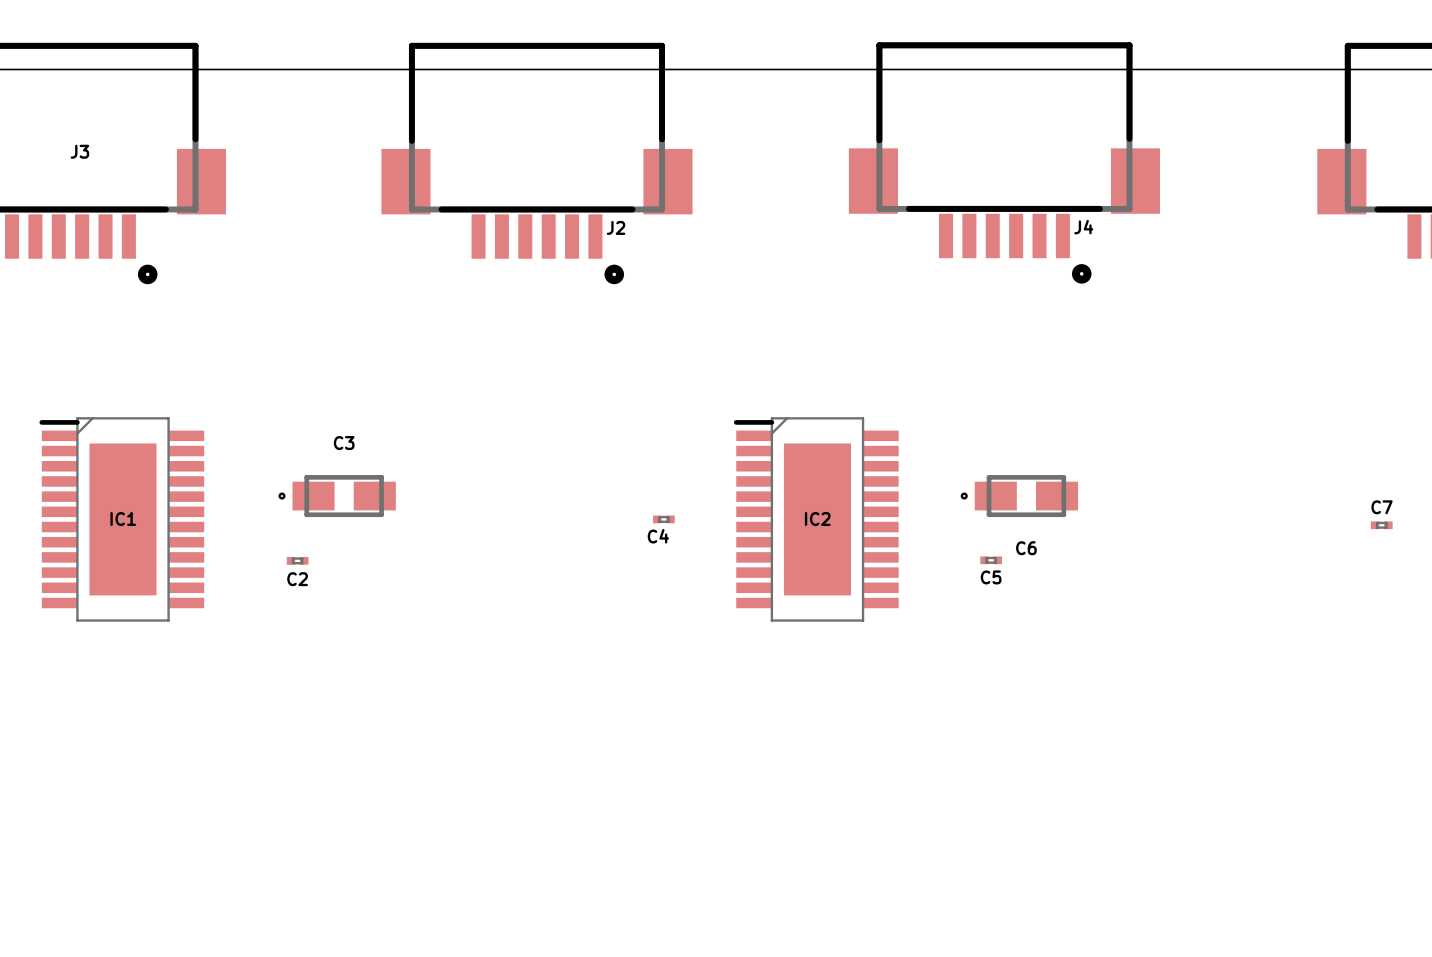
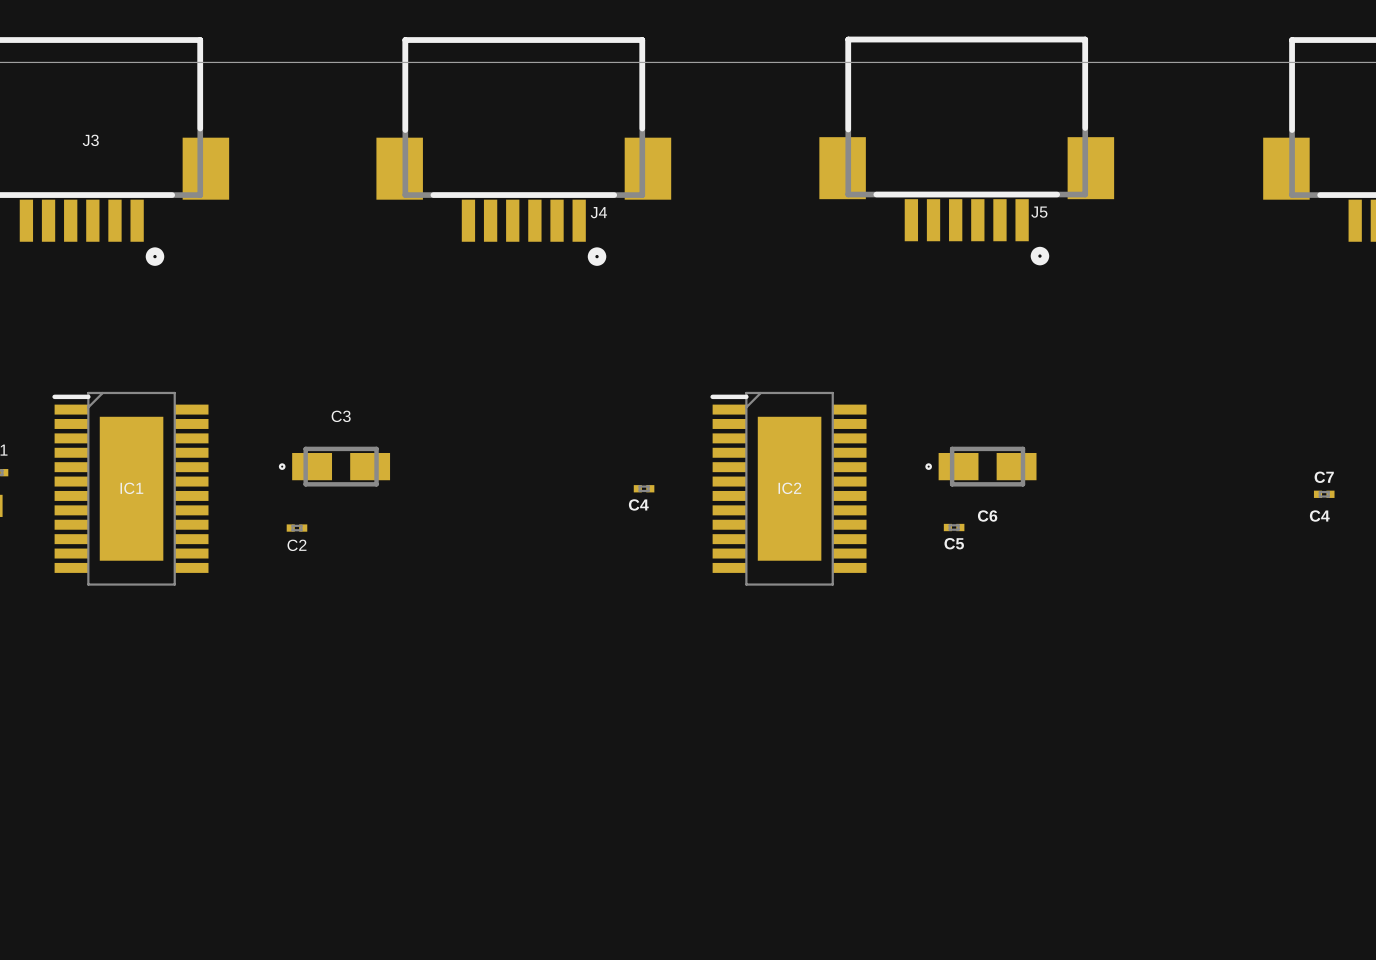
J2 name: J2 (616, 227) -> J4 (598, 212)
J4 name: J4 (1083, 227) -> J5 (1039, 212)
text: none -> C4 (1319, 516)

